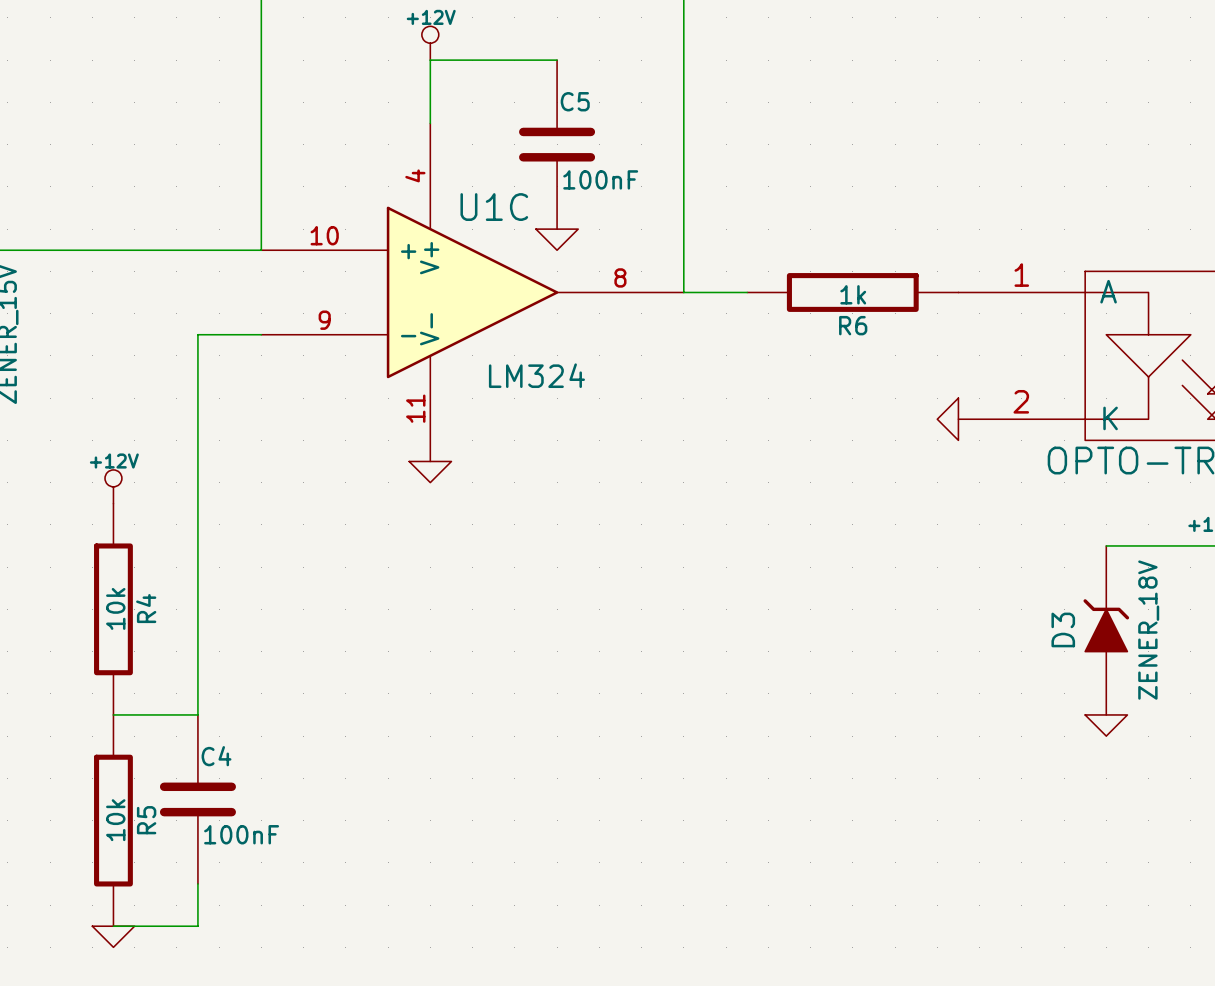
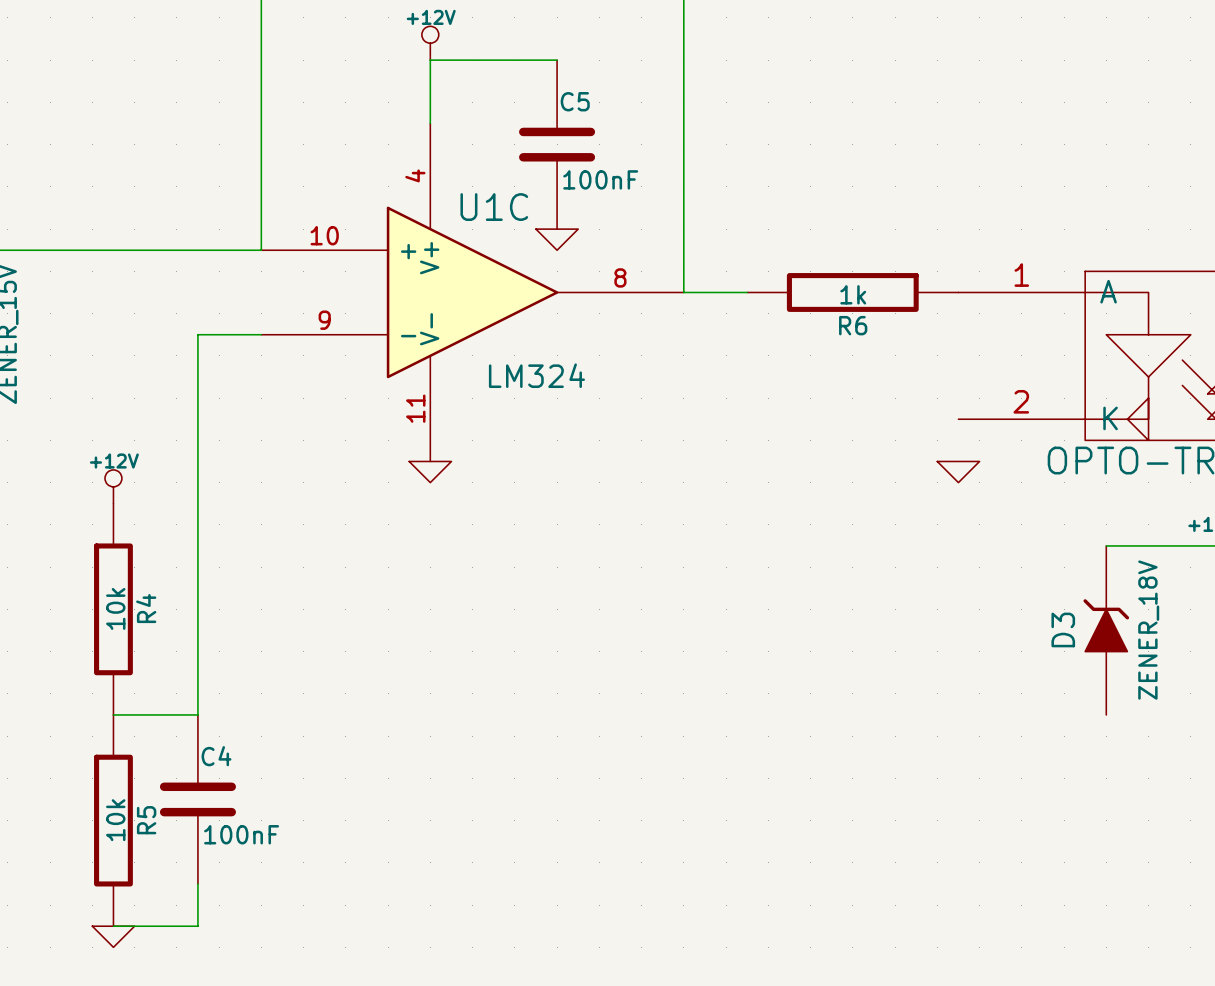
power symbol rotation: 0° (947, 419) -> 90° counterclockwise (958, 472)
power symbol position: (947, 419) -> (958, 472)
power symbol: none -> (1137, 419)
power symbol: (1106, 725) -> none

